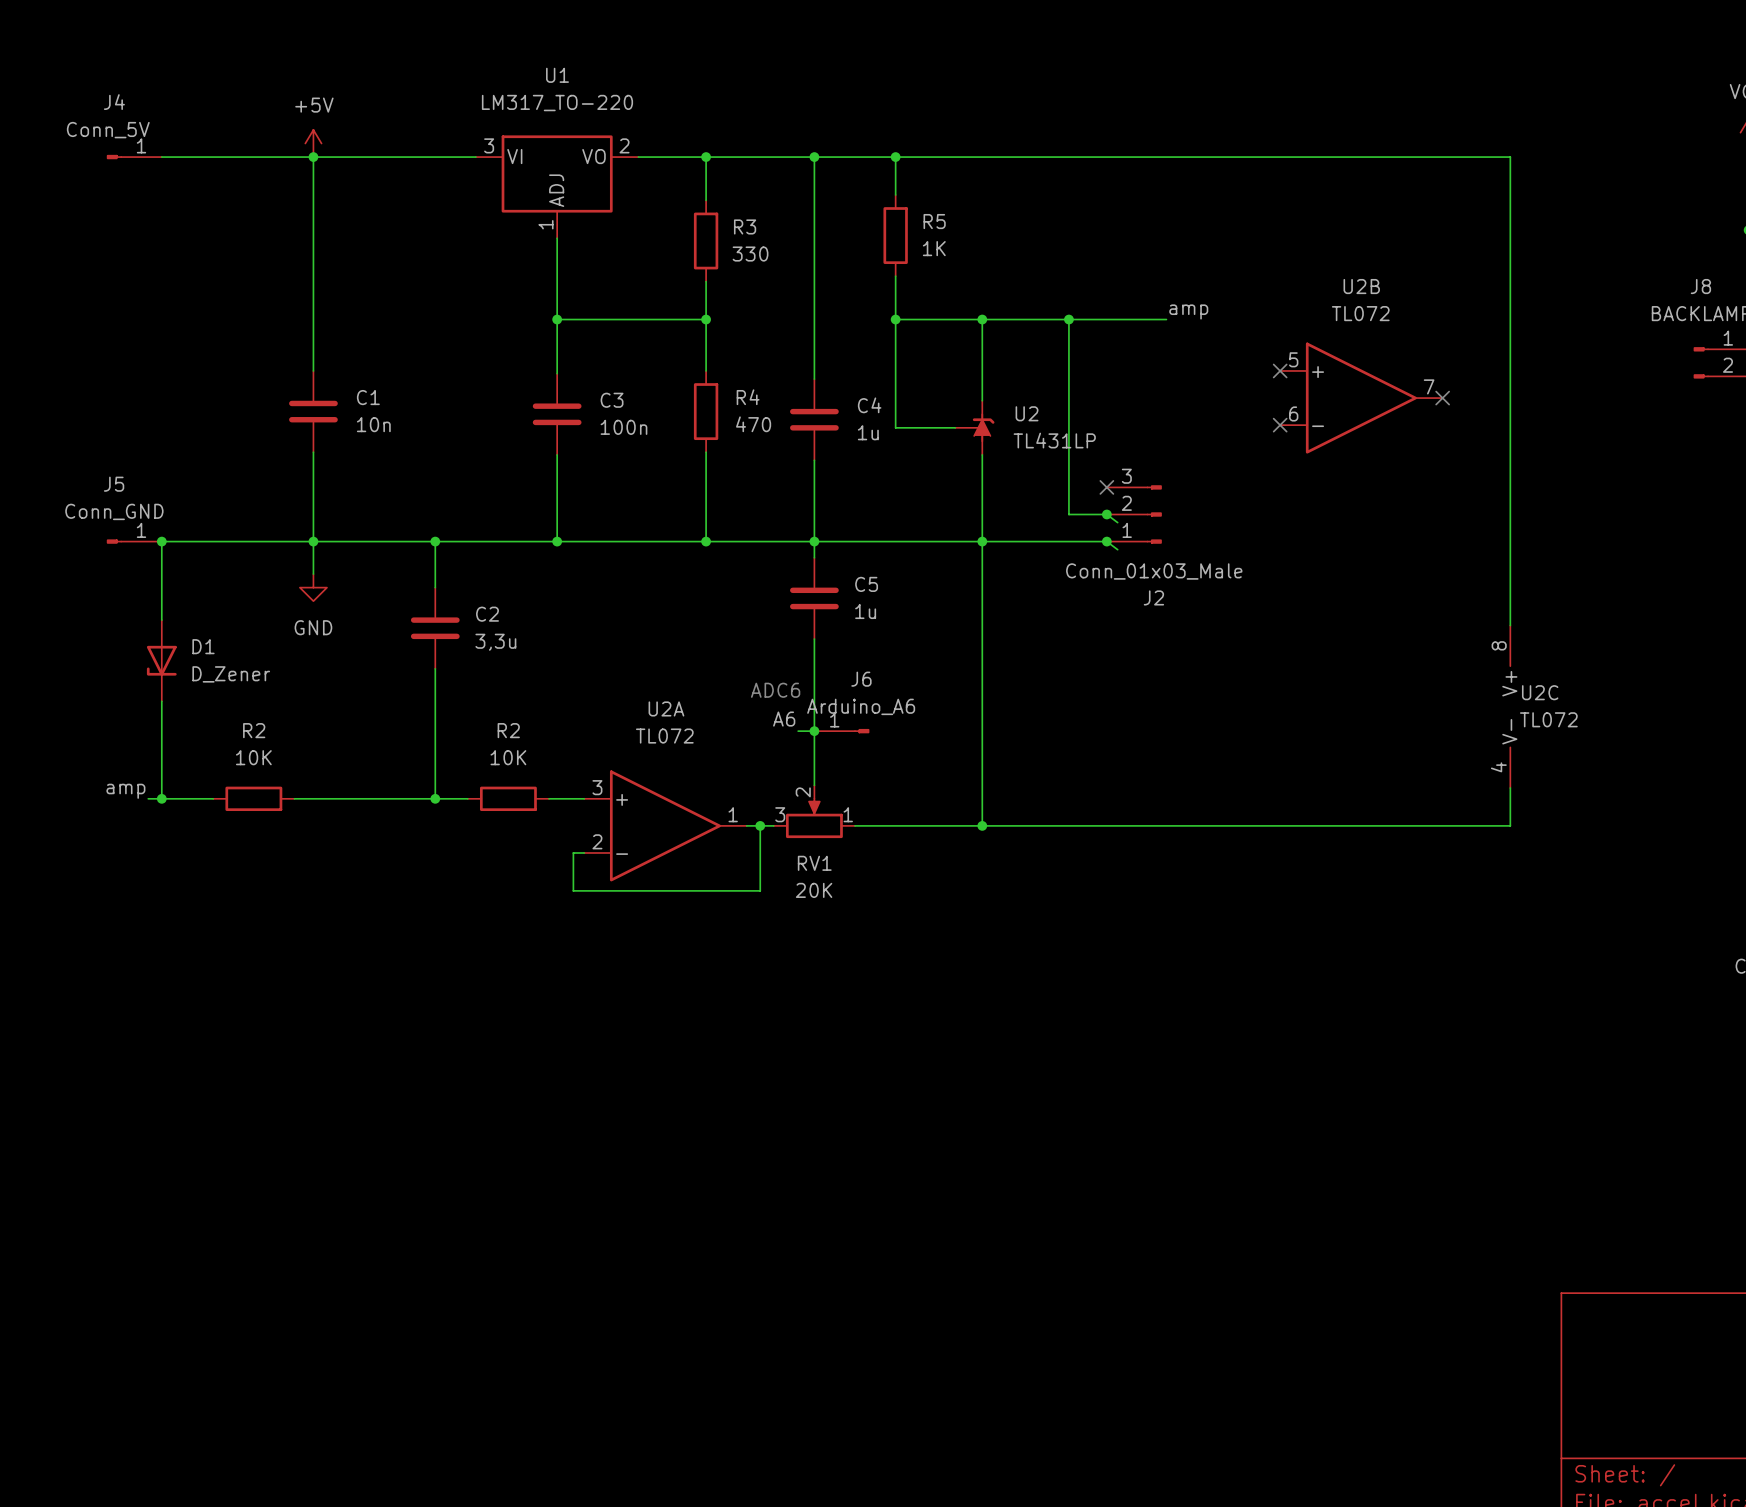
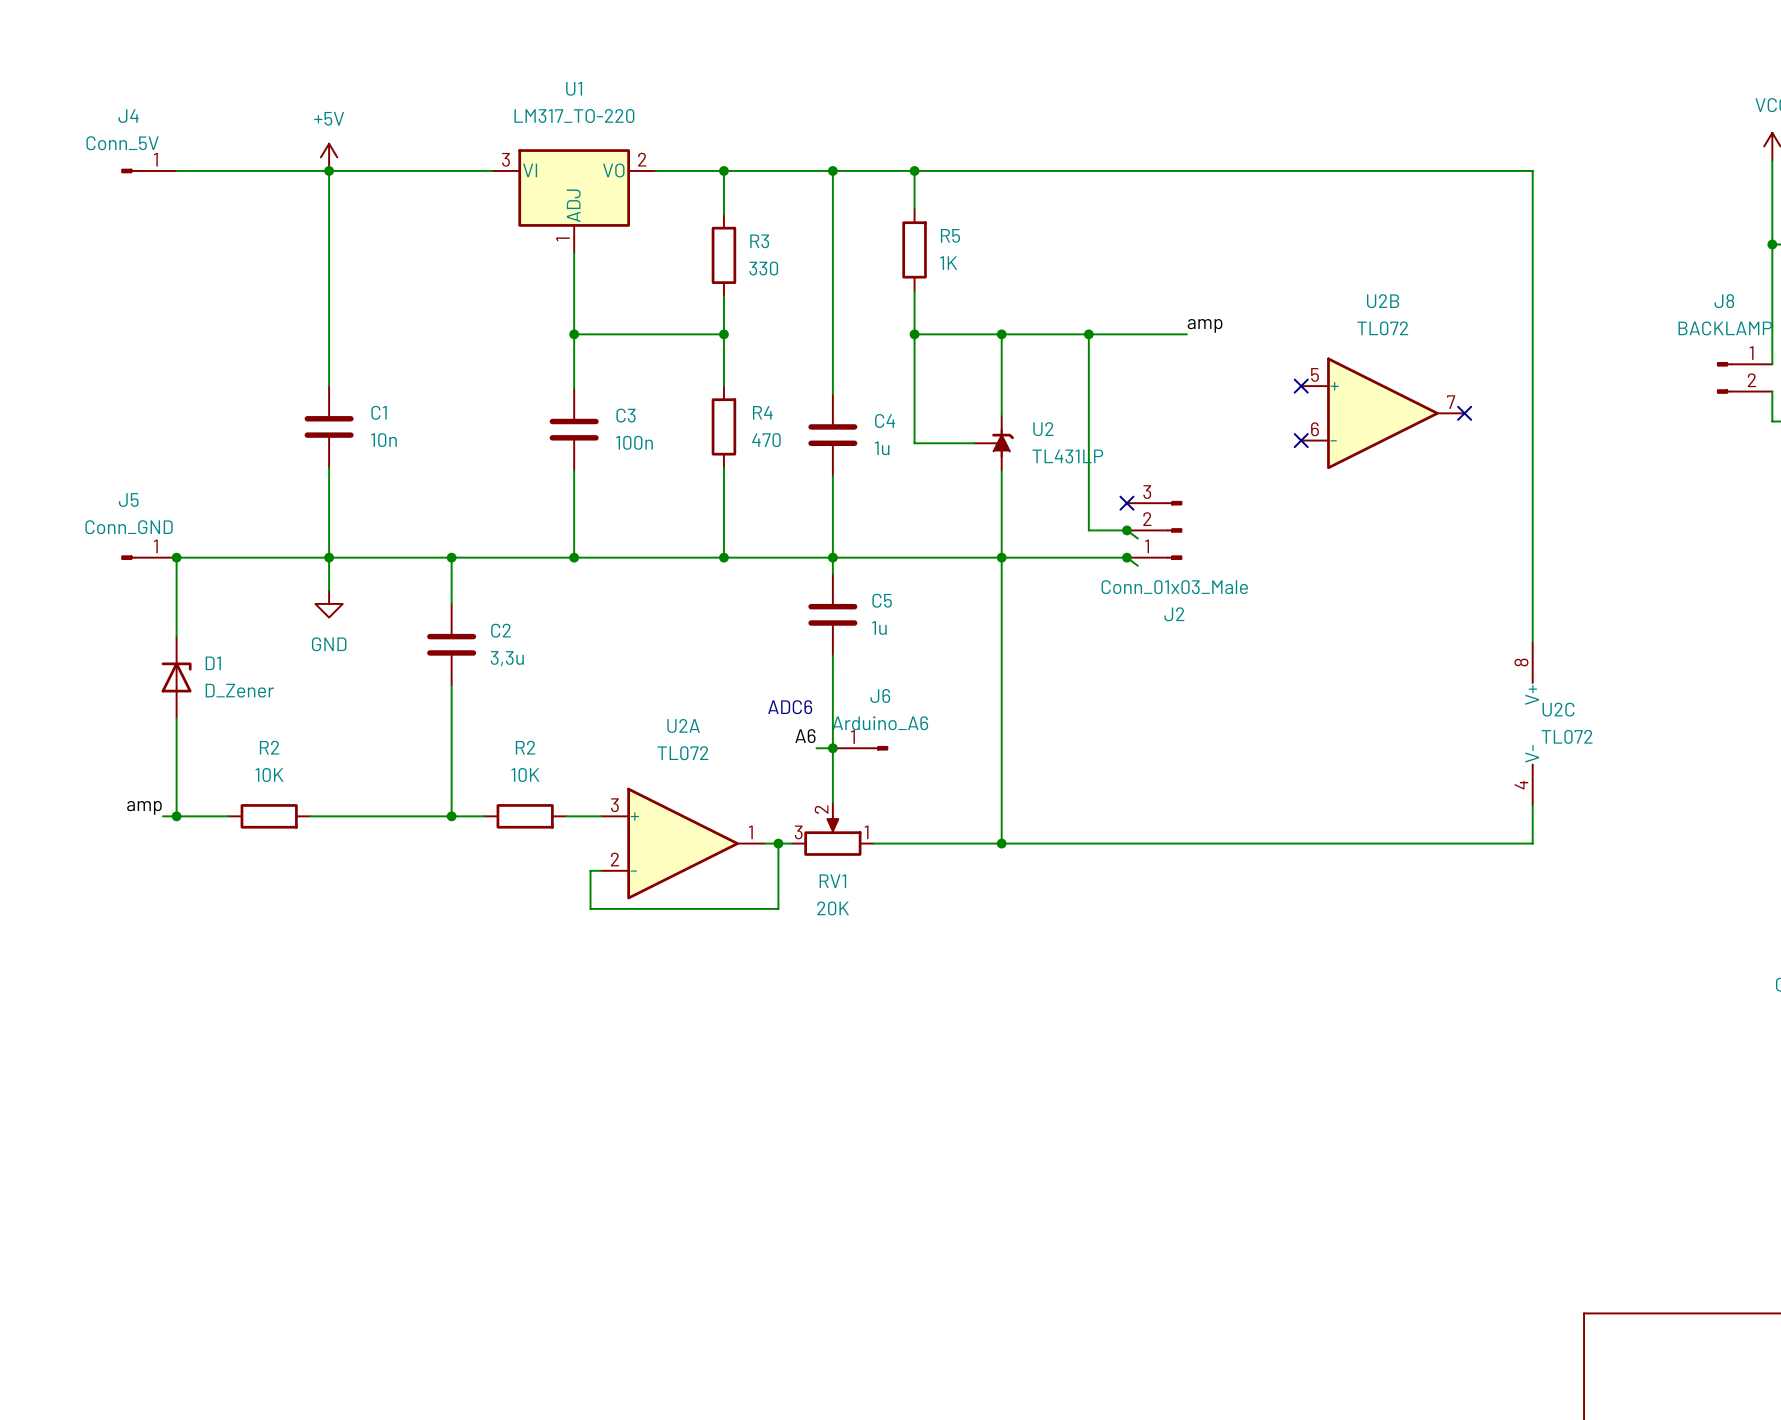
D1 rotation: 0° (161, 660) -> 180° (176, 677)

